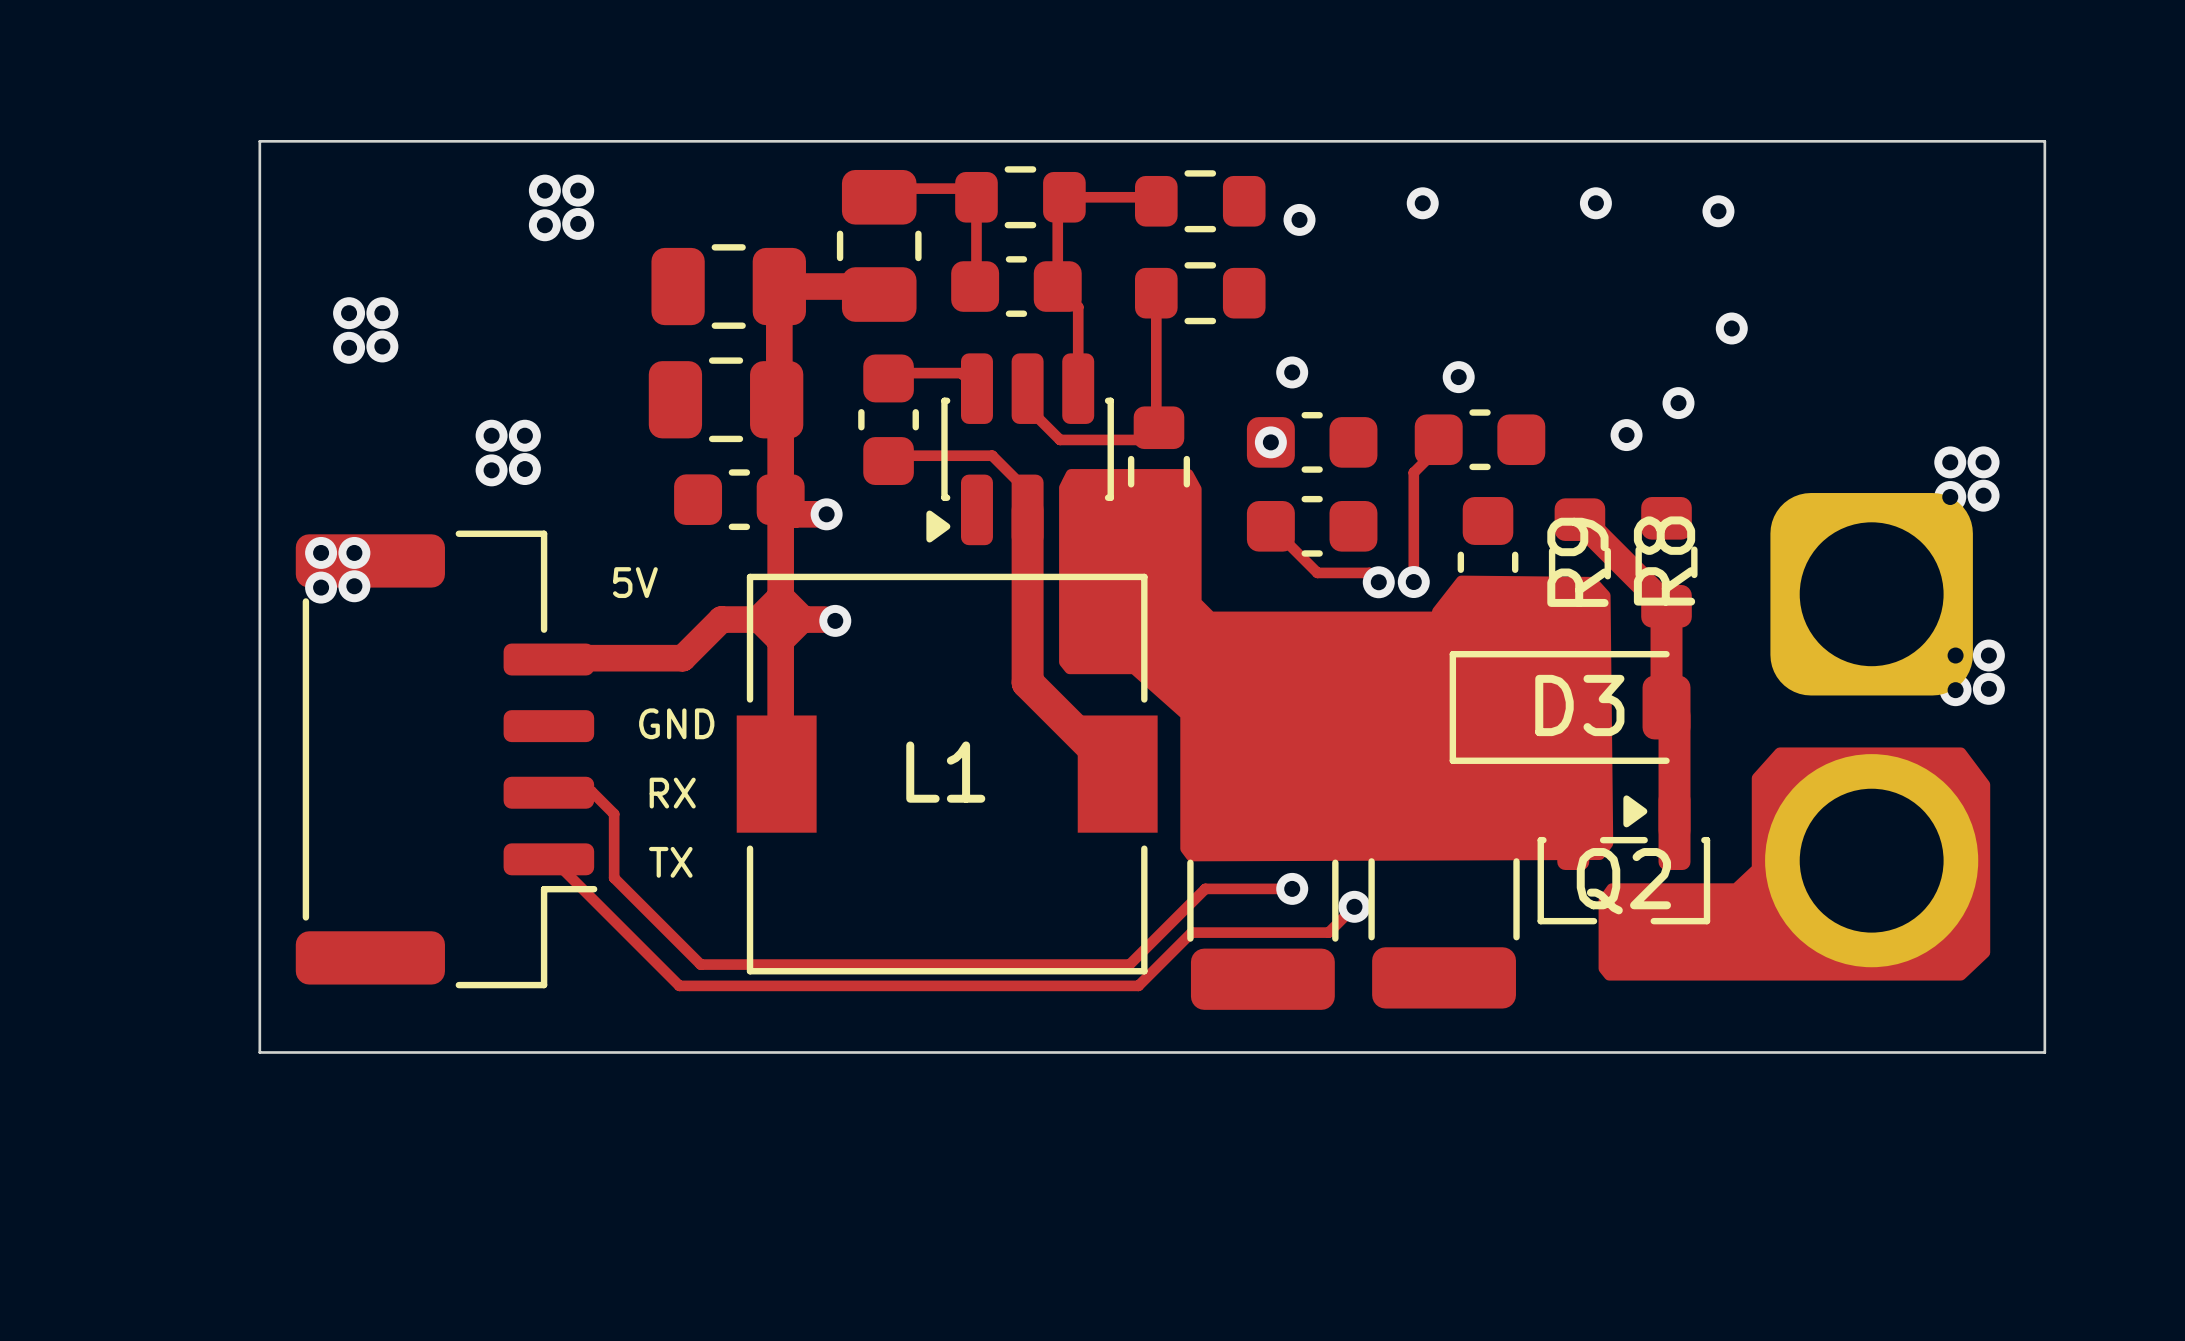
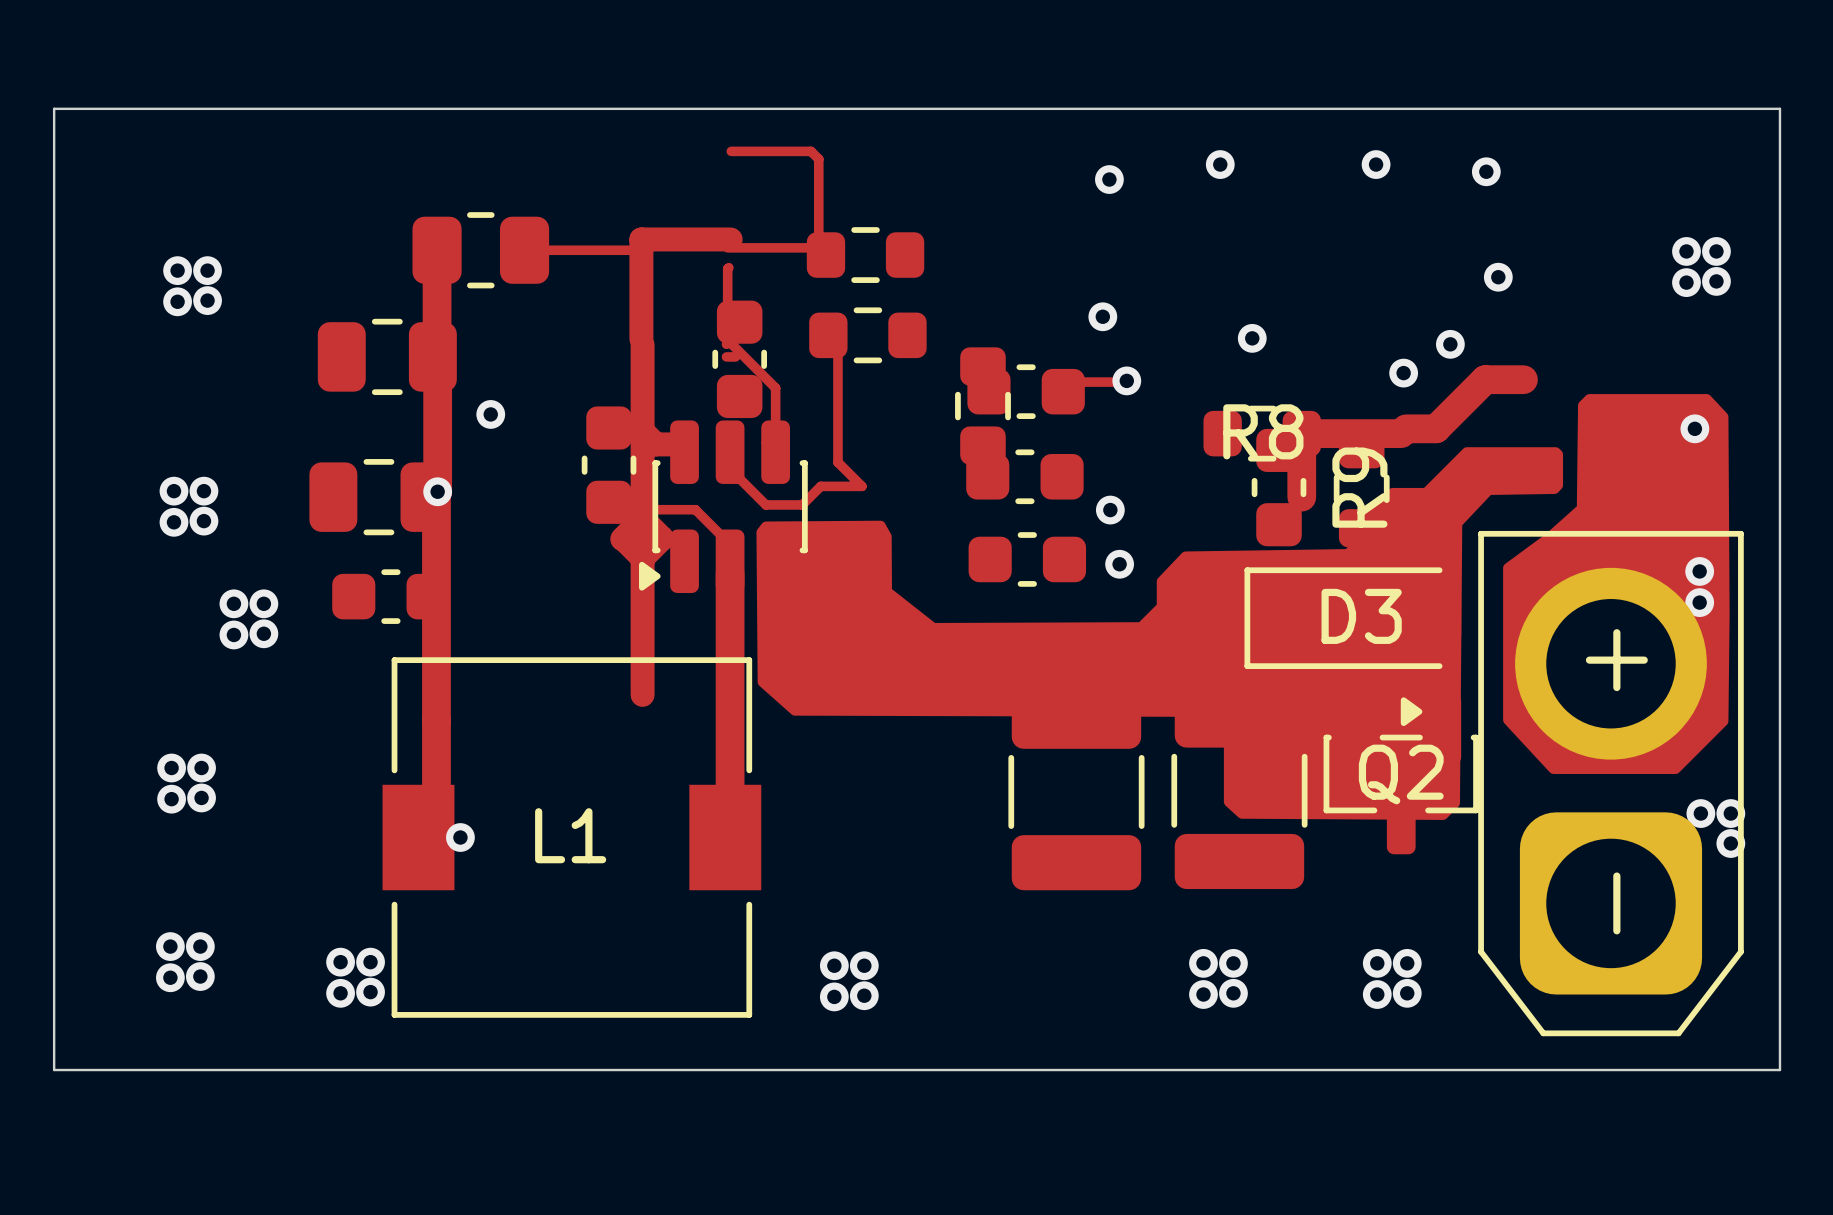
board edge: (259, 141) (259, 1052) (2044, 1052) -> (173, 108) (54, 108) (54, 1070) (1779, 1070) (1779, 928)
via: (544, 190) -> none
via: (578, 190) -> none
part: (1020, 197) -> none
track: (1156, 201) (1152, 197) (1064, 197) (1057, 203) (1057, 286) (1078, 307) (1078, 388) -> none
part: (1200, 201) -> none
via: (578, 223) -> none
via: (544, 225) -> none
part rotation: 0° (879, 245) -> 90° clockwise (480, 250)
part position: (879, 245) -> (480, 250)
part footprint: [951, 256, 1082, 317] -> [806, 227, 925, 283]
part: (728, 286) -> none
track: (1156, 293) (1156, 425) (1158, 427) (1146, 439) (1060, 439) (1027, 407) (1027, 388) -> none
part: (1200, 293) -> none
track: none -> (648, 247) (646, 250) (524, 250)
track: none -> (727, 247) (818, 247) (825, 255)
track: none -> (437, 250) (437, 350) (429, 358) (437, 366) (436, 819)
via: none -> (1686, 251)
via: none -> (1716, 251)
via: (349, 313) -> none
via: (382, 313) -> none
track: none -> (728, 267) (726, 344)
via: none -> (177, 270)
via: none -> (207, 270)
via: none -> (1716, 281)
via: none -> (1686, 282)
via: (382, 346) -> none
via: (349, 347) -> none
via: none -> (207, 300)
via: none -> (177, 301)
track: (889, 373) (961, 373) (976, 388) -> none
via position: (1458, 377) -> (1252, 338)
track: none -> (828, 335) (837, 344) (837, 462) (861, 486) (820, 486) (802, 504) (765, 504) (730, 469) (730, 452)
part: none -> (867, 335)
track: none -> (726, 338) (775, 388) (775, 452) (766, 442)
part: (726, 399) -> none
part: none -> (387, 356)
track: none -> (726, 356) (735, 356)
via: (491, 435) -> none
via: (524, 435) -> none
part: (1480, 439) -> none
via position: (1270, 442) -> (1126, 380)
part: (1312, 442) -> none
track: none -> (1523, 379) (1485, 379) (1436, 428) (1406, 428) (1401, 433) (1301, 433) (1301, 497) (1307, 503)
track: (1444, 443) (1413, 472) (1413, 582) -> none
track: none -> (1119, 382) (1072, 382) (1063, 391)
part position: (1020, 449) -> (723, 506)
track: (889, 455) (992, 455) (1027, 491) (1027, 682) (1121, 776) (1121, 792) -> none
part: none -> (1026, 391)
drawing: none -> [756, 394, 1730, 820]
via: (1950, 462) -> none
via: (1983, 462) -> none
via: (524, 469) -> none
drawing: [1059, 469, 1991, 981] -> none
via: (491, 470) -> none
via: none -> (490, 414)
via: (1983, 495) -> none
part rotation: 0° (739, 499) -> 90° clockwise (609, 465)
via: (826, 514) -> none
track: (1579, 519) (1666, 606) (1666, 707) (1674, 715) (1674, 830) -> none
track: (1270, 526) (1317, 572) (1369, 572) (1378, 582) -> none
part: (1312, 526) -> none
part: none -> (1024, 476)
via: (321, 552) -> none
via: (354, 552) -> none
R8 rotation: 0° (1666, 562) -> 90° clockwise (1262, 433)
R8 position: (1666, 562) -> (1262, 433)
via: none -> (173, 491)
via: none -> (203, 491)
via: none -> (437, 491)
part: none -> (378, 497)
track: none -> (631, 501) (640, 509) (695, 509) (730, 544) (730, 561)
via: (1378, 582) -> none
via: (1413, 582) -> none
via: (354, 586) -> none
via: (321, 587) -> none
via: none -> (1110, 510)
via: none -> (203, 521)
via: none -> (173, 522)
track: (835, 620) (721, 619) (682, 658) (548, 658) -> none
via: (835, 620) -> none
part: none -> (1027, 559)
via: none -> (1119, 564)
via: (1988, 655) -> none
track: none -> (731, 572) (730, 832) (725, 837)
part: none -> (390, 596)
via: (1988, 688) -> none
via: none -> (233, 603)
via: none -> (263, 603)
via: none -> (263, 633)
via: none -> (233, 634)
part side: bottom (1871, 730) -> top (1610, 783)
part: (446, 759) -> none
L1 position: (947, 774) -> (571, 837)
track: (548, 791) (591, 791) (614, 814) (614, 877) (700, 964) (1129, 964) (1205, 888) (1292, 888) -> none
track: (548, 858) (551, 858) (679, 985) (1138, 985) (1191, 932) (1328, 932) (1354, 906) -> none
via: none -> (171, 768)
via: none -> (201, 768)
via: (1292, 888) -> none
via: (1354, 906) -> none
via: none -> (201, 797)
via: none -> (171, 799)
via: none -> (1700, 813)
via: none -> (1730, 813)
via: none -> (460, 837)
via: none -> (1730, 843)
via: none -> (170, 946)
via: none -> (200, 946)
via: none -> (340, 962)
via: none -> (370, 962)
via: none -> (1203, 963)
via: none -> (1233, 963)
via: none -> (1377, 963)
via: none -> (1407, 963)
via: none -> (834, 965)
via: none -> (864, 965)
via: none -> (200, 976)
via: none -> (170, 977)
via: none -> (370, 992)
via: none -> (340, 993)
via: none -> (1233, 993)
via: none -> (1407, 993)
via: none -> (1203, 994)
via: none -> (1377, 994)
via: none -> (864, 995)
via: none -> (834, 996)

